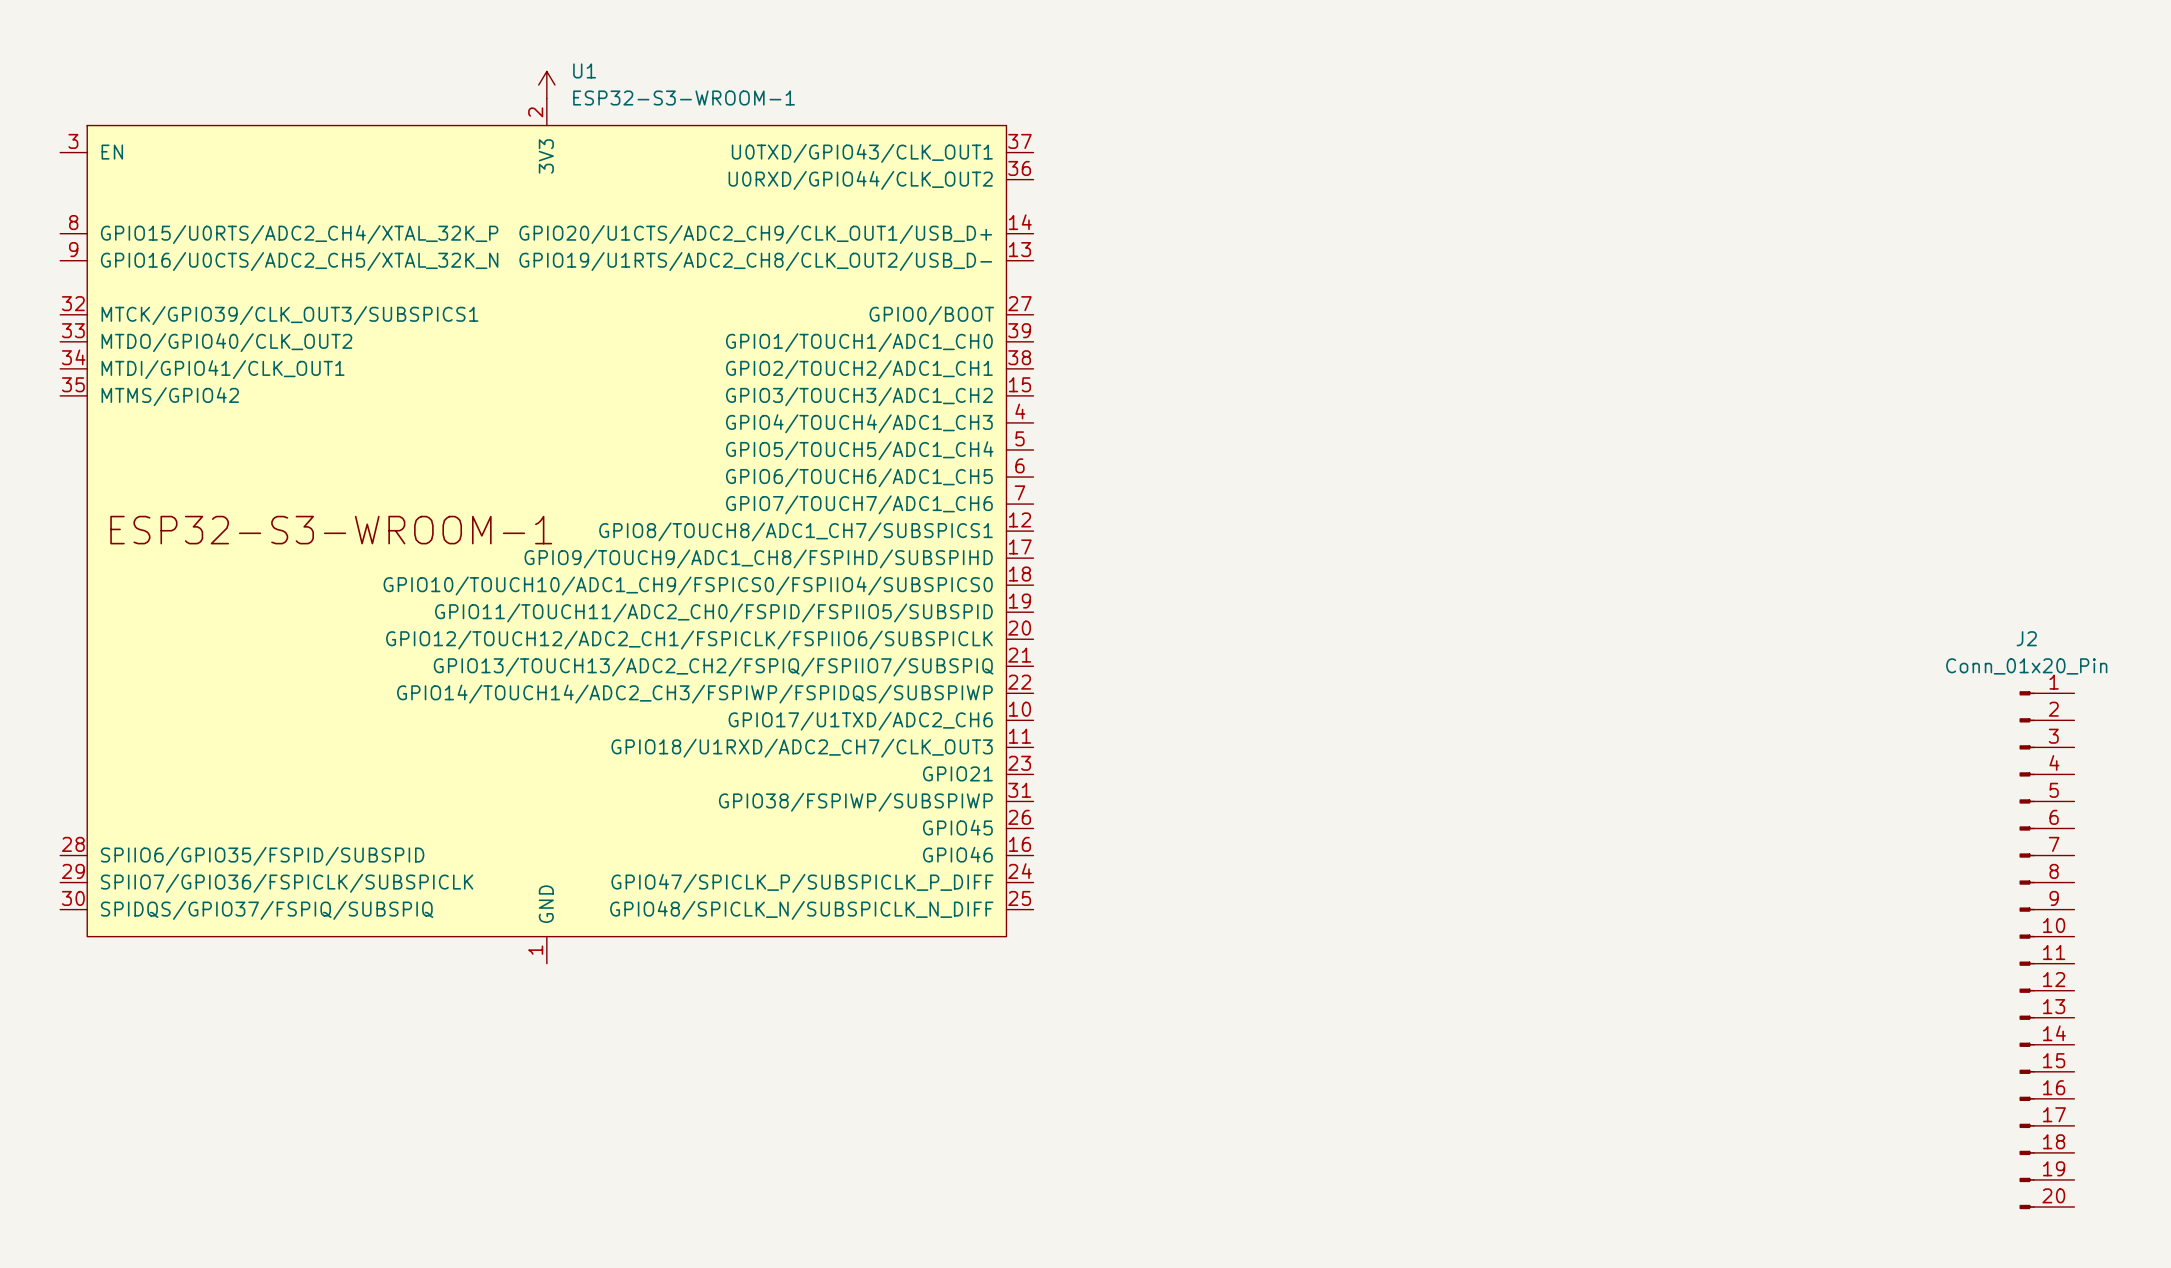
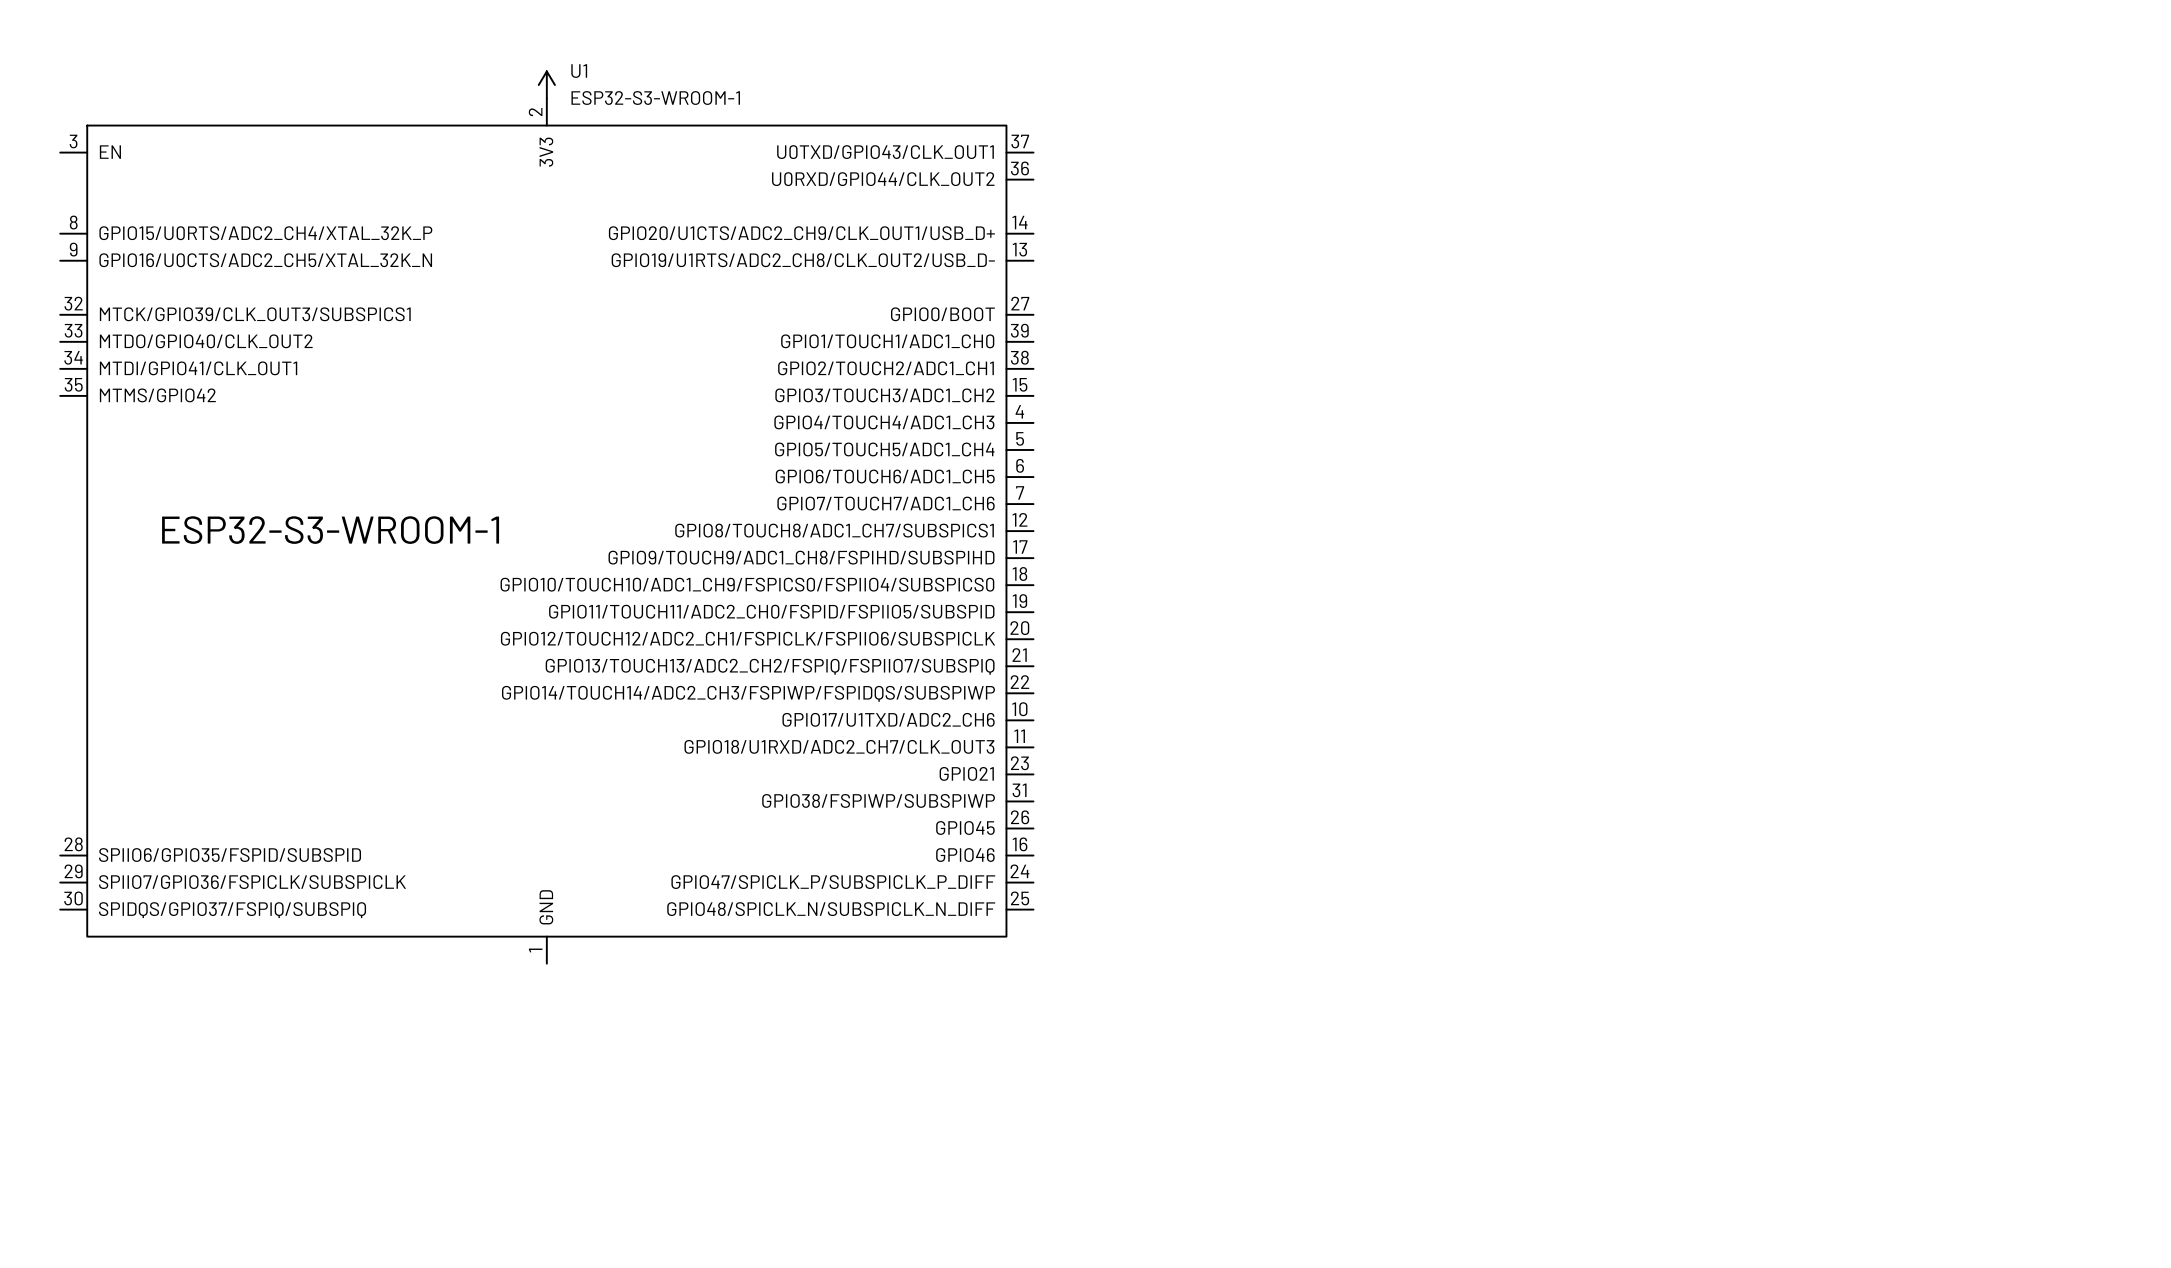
J2: Conn_01x20_Pin (2046, 950) -> none

